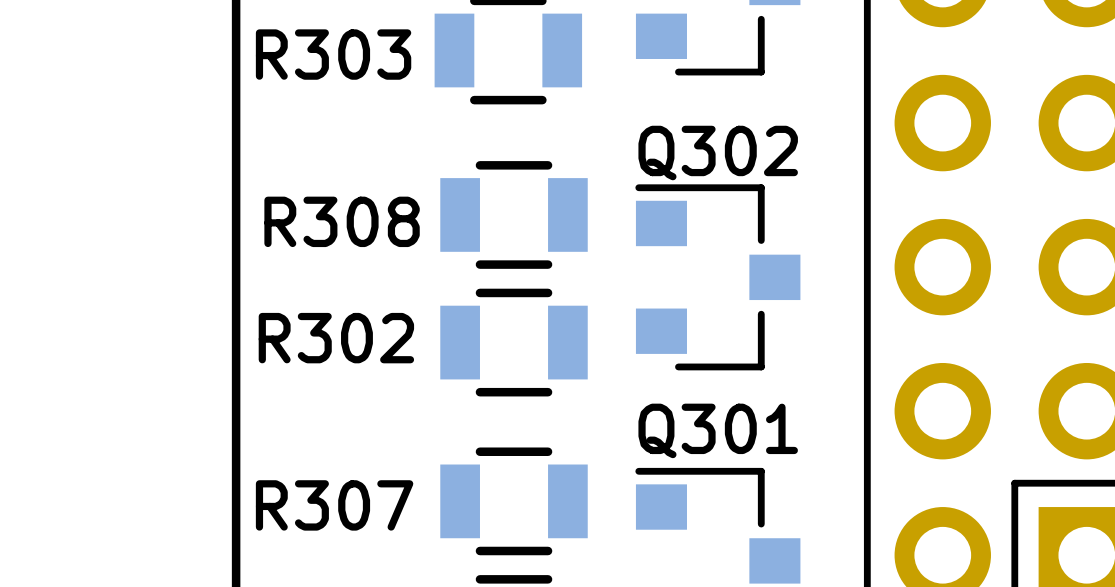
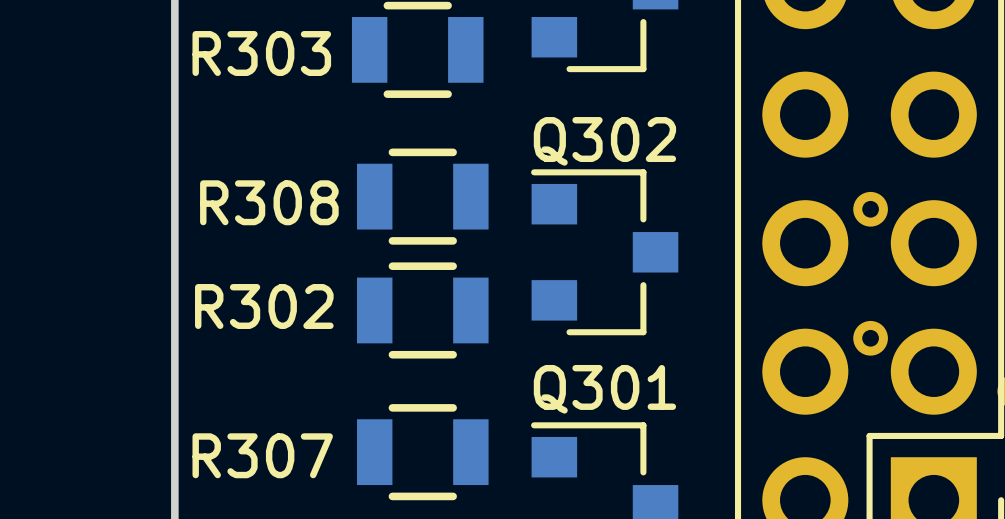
part: none -> (870, 209)
part: none -> (870, 338)

